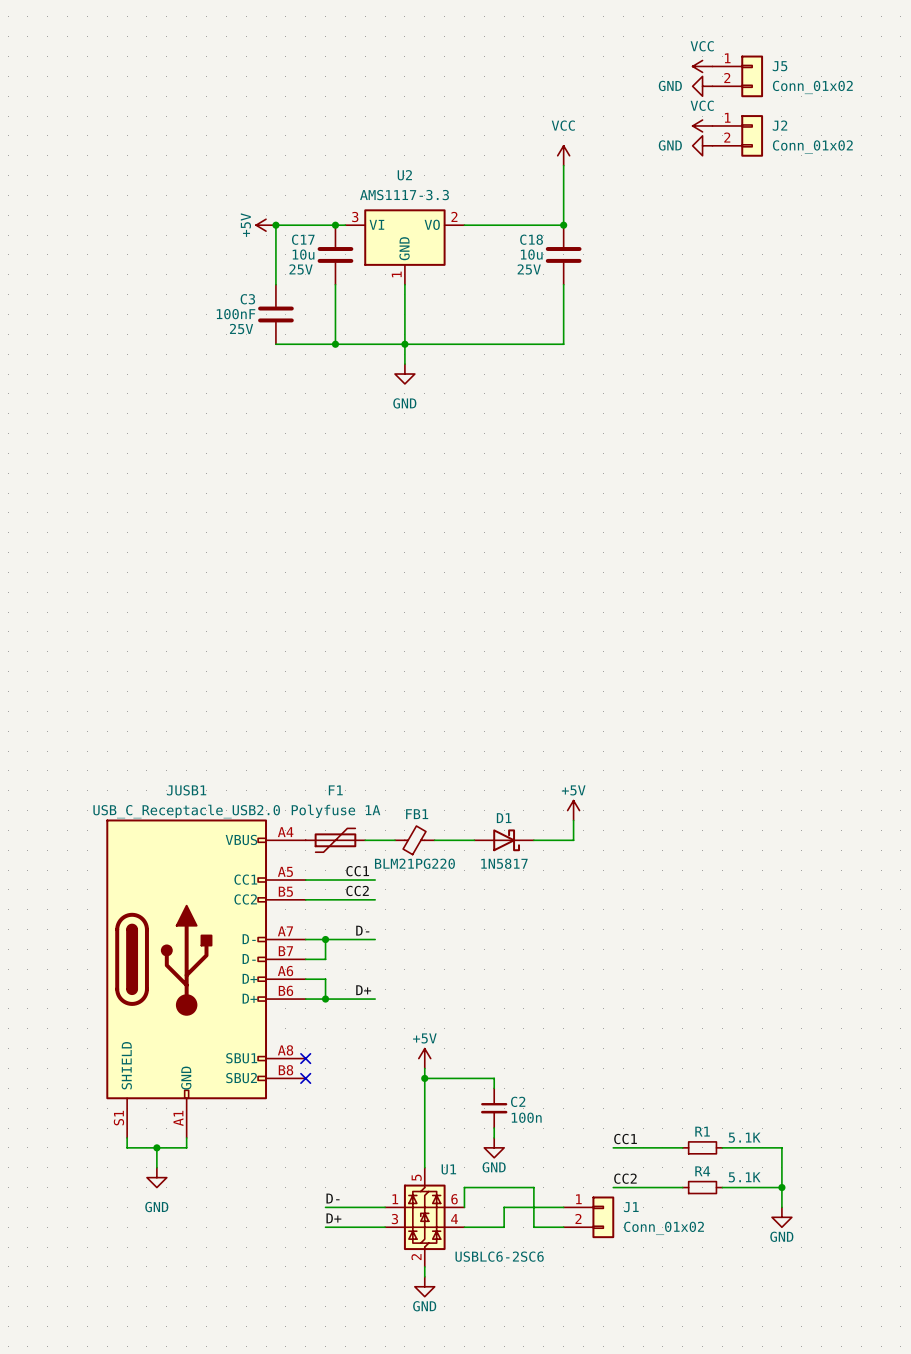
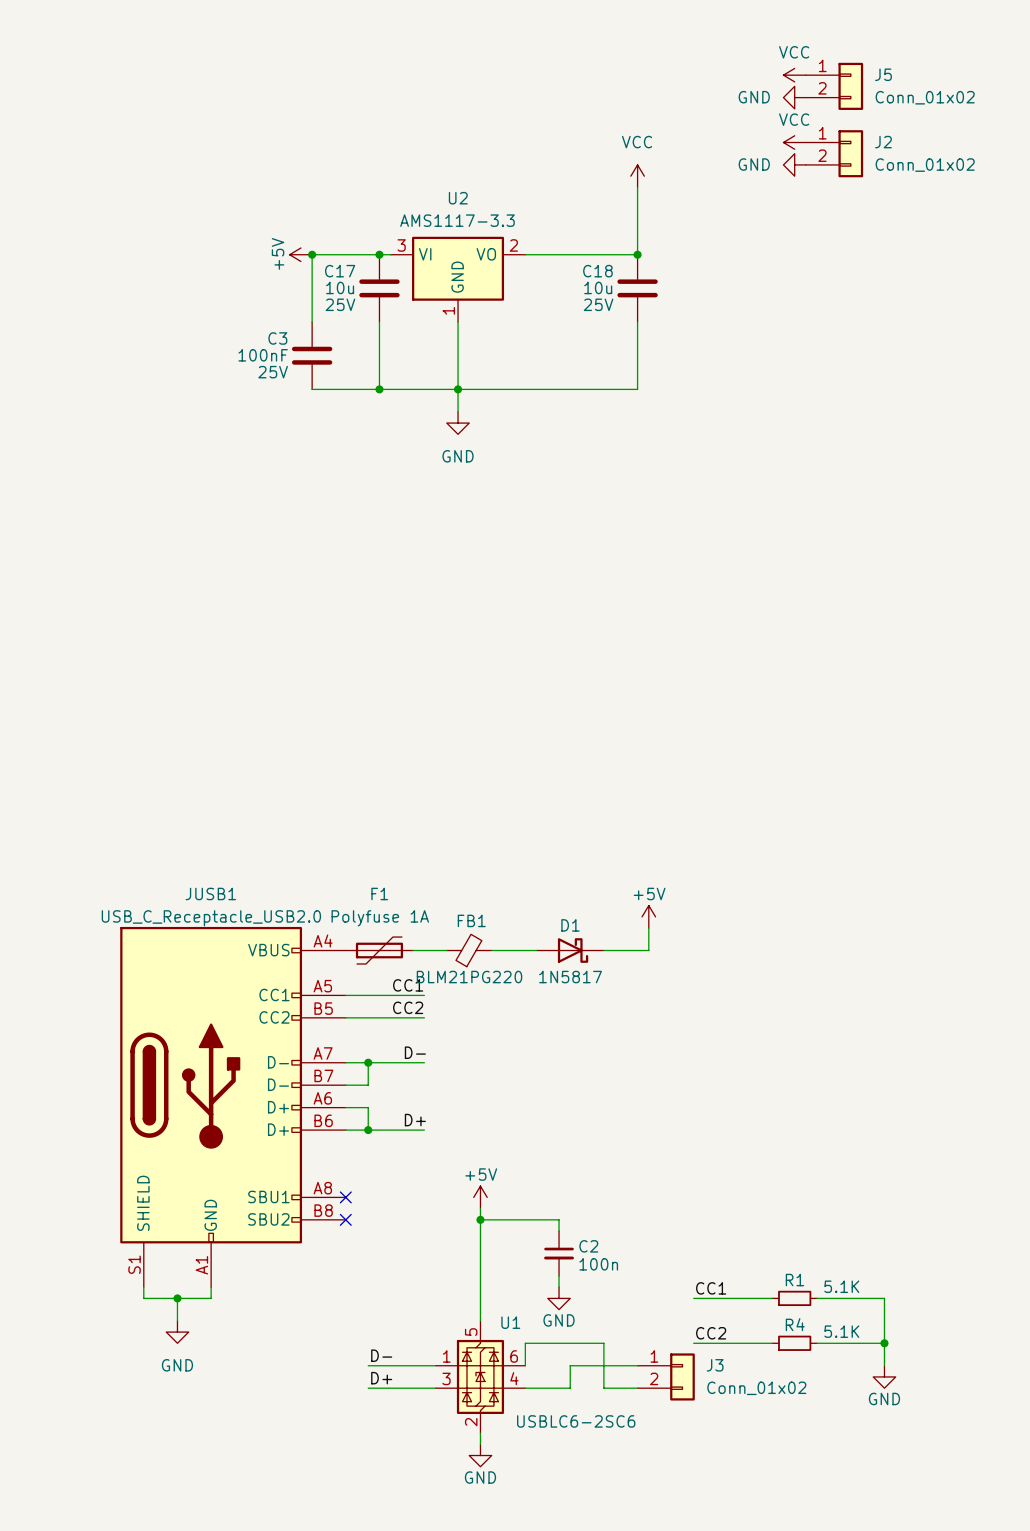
J1 name: J1 (631, 1207) -> J3 (715, 1365)

